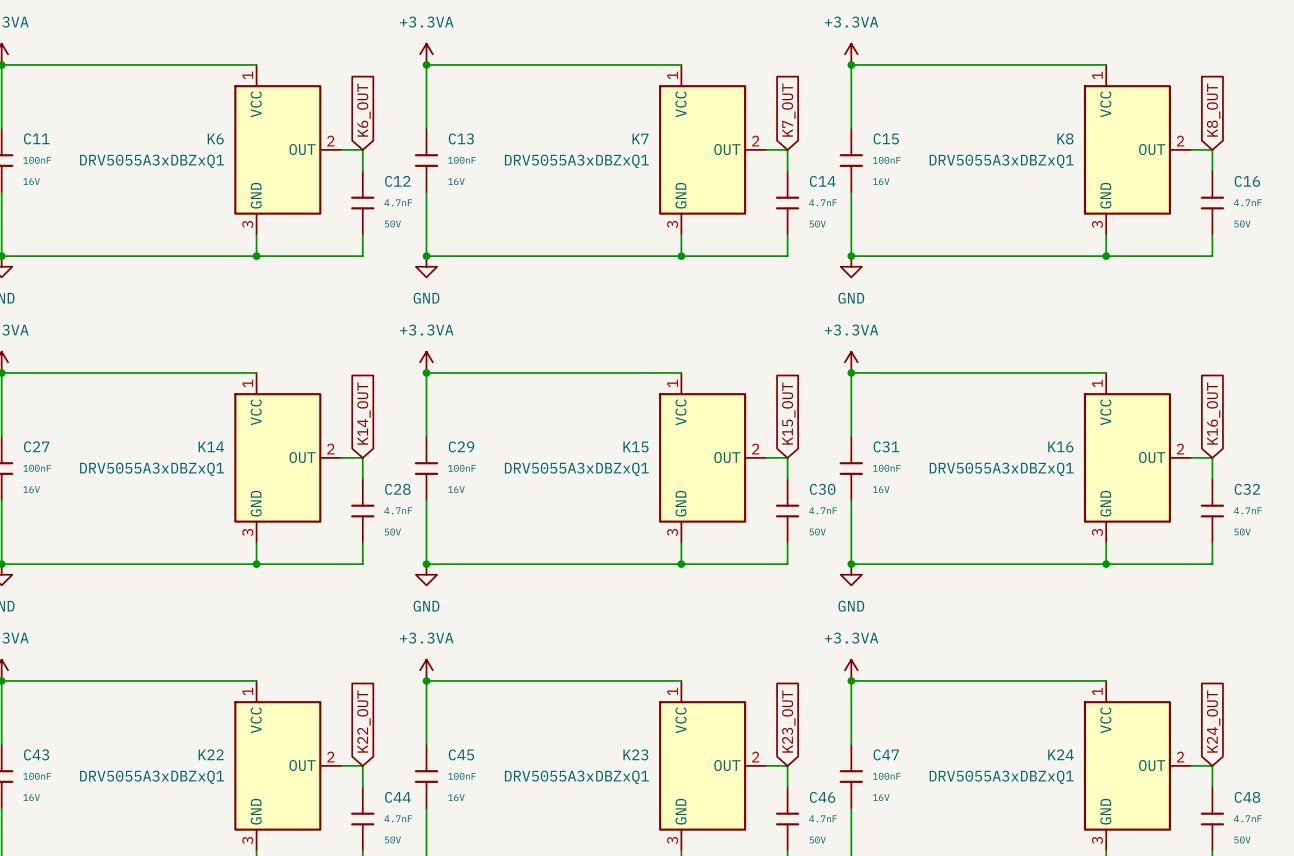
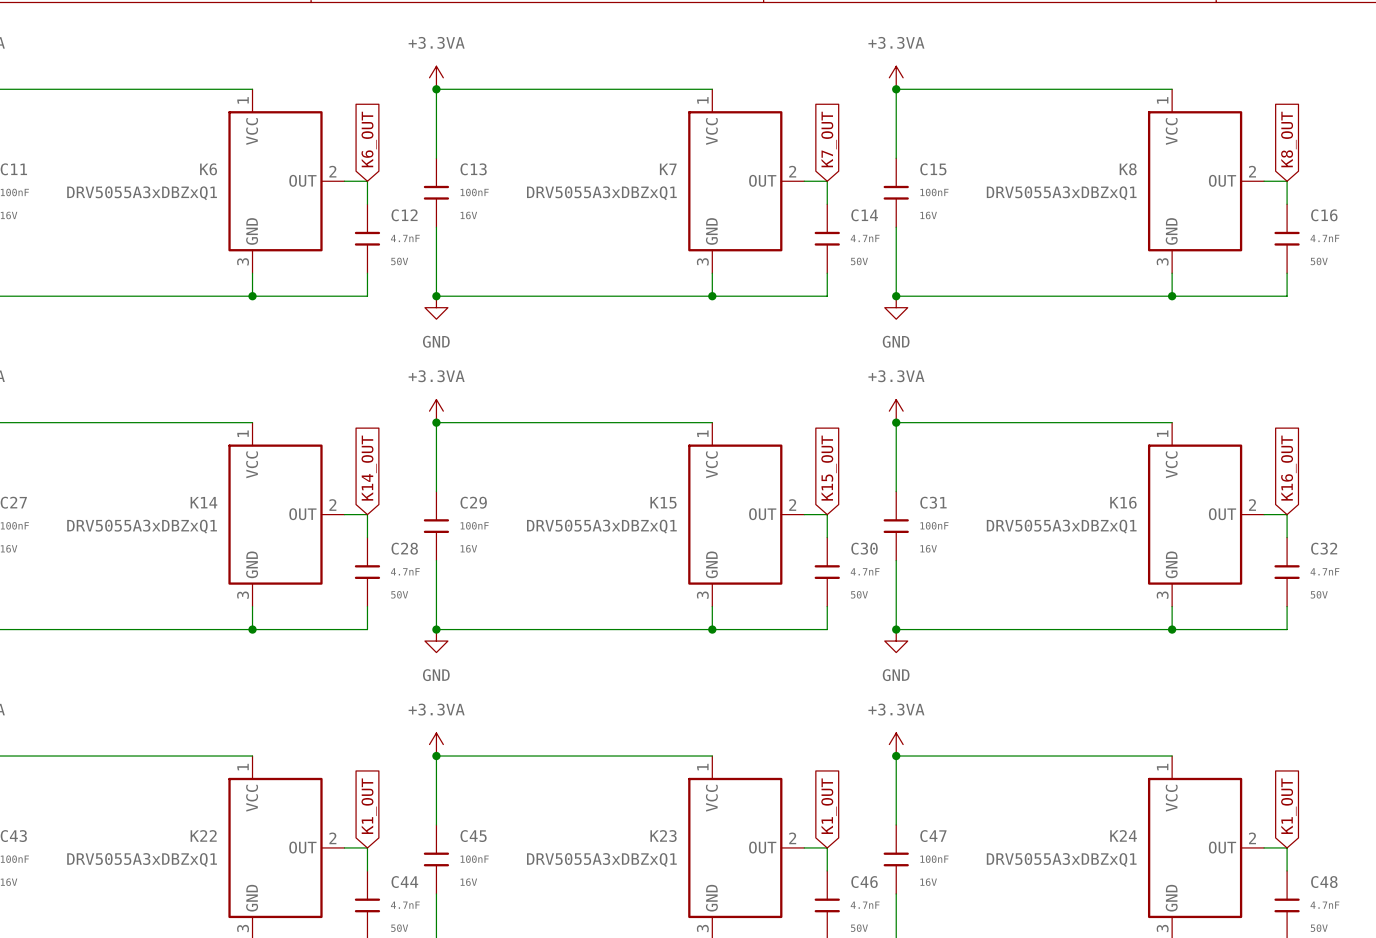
global label: K22_OUT (363, 721) -> K1_OUT (369, 806)
global label: K23_OUT (788, 721) -> K1_OUT (829, 806)
global label: K24_OUT (1213, 721) -> K1_OUT (1288, 806)

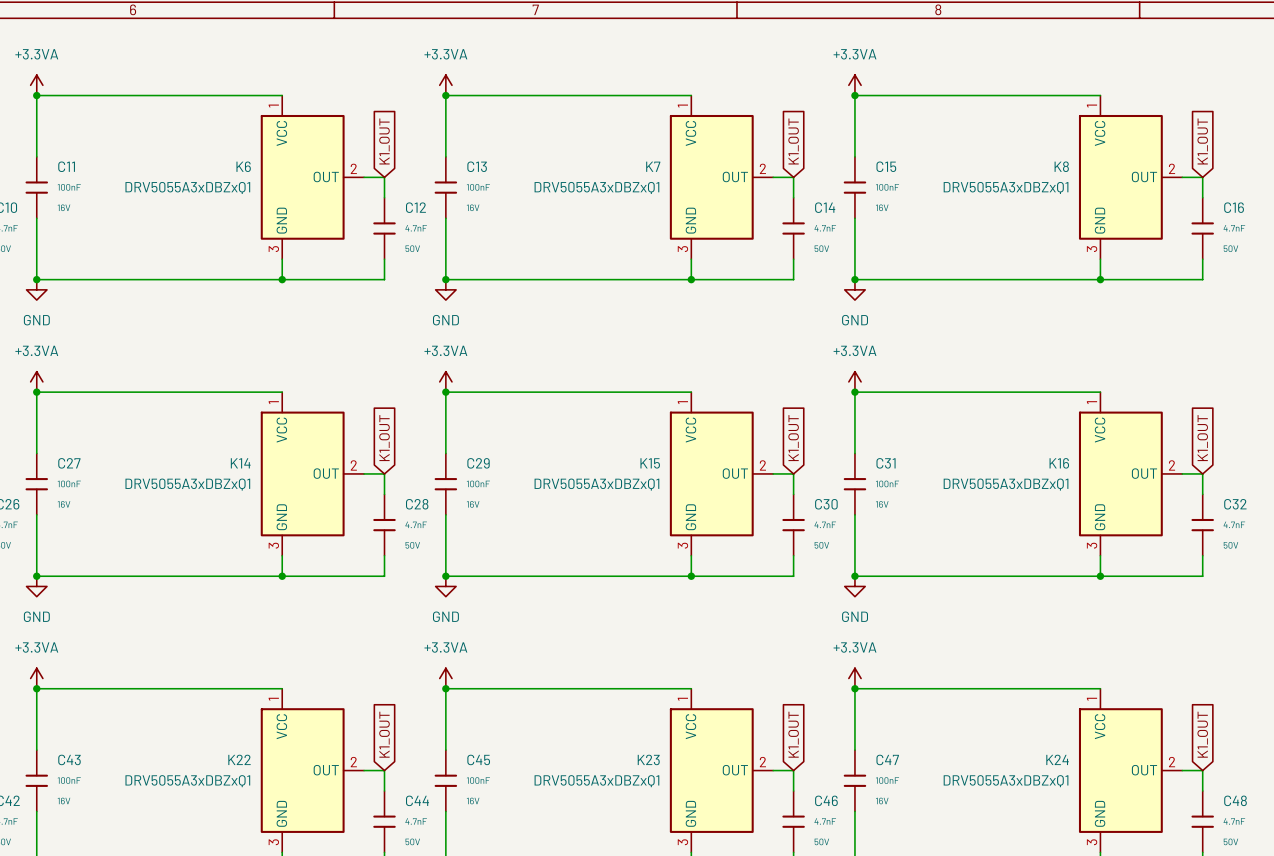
global label: K6_OUT (369, 139) -> K1_OUT (384, 141)
global label: K7_OUT (829, 139) -> K1_OUT (793, 141)
global label: K8_OUT (1288, 139) -> K1_OUT (1202, 141)
global label: K14_OUT (369, 468) -> K1_OUT (384, 438)
global label: K15_OUT (829, 468) -> K1_OUT (793, 438)
global label: K16_OUT (1288, 468) -> K1_OUT (1202, 438)

